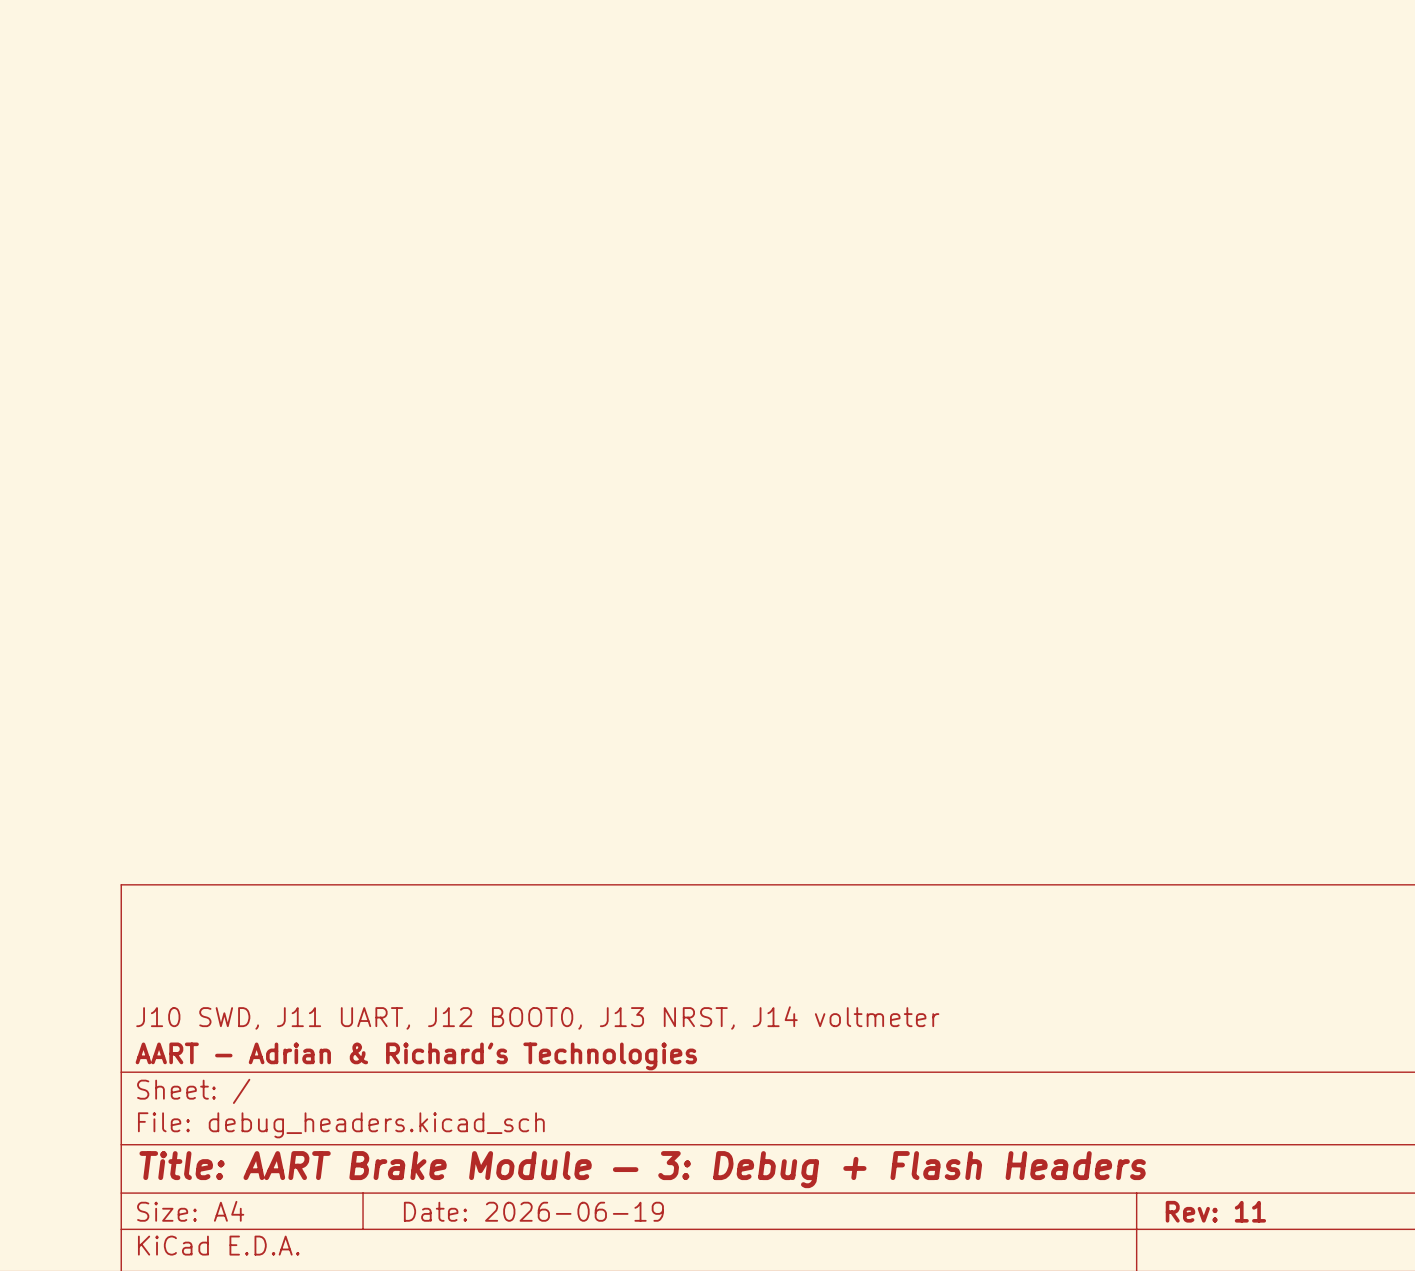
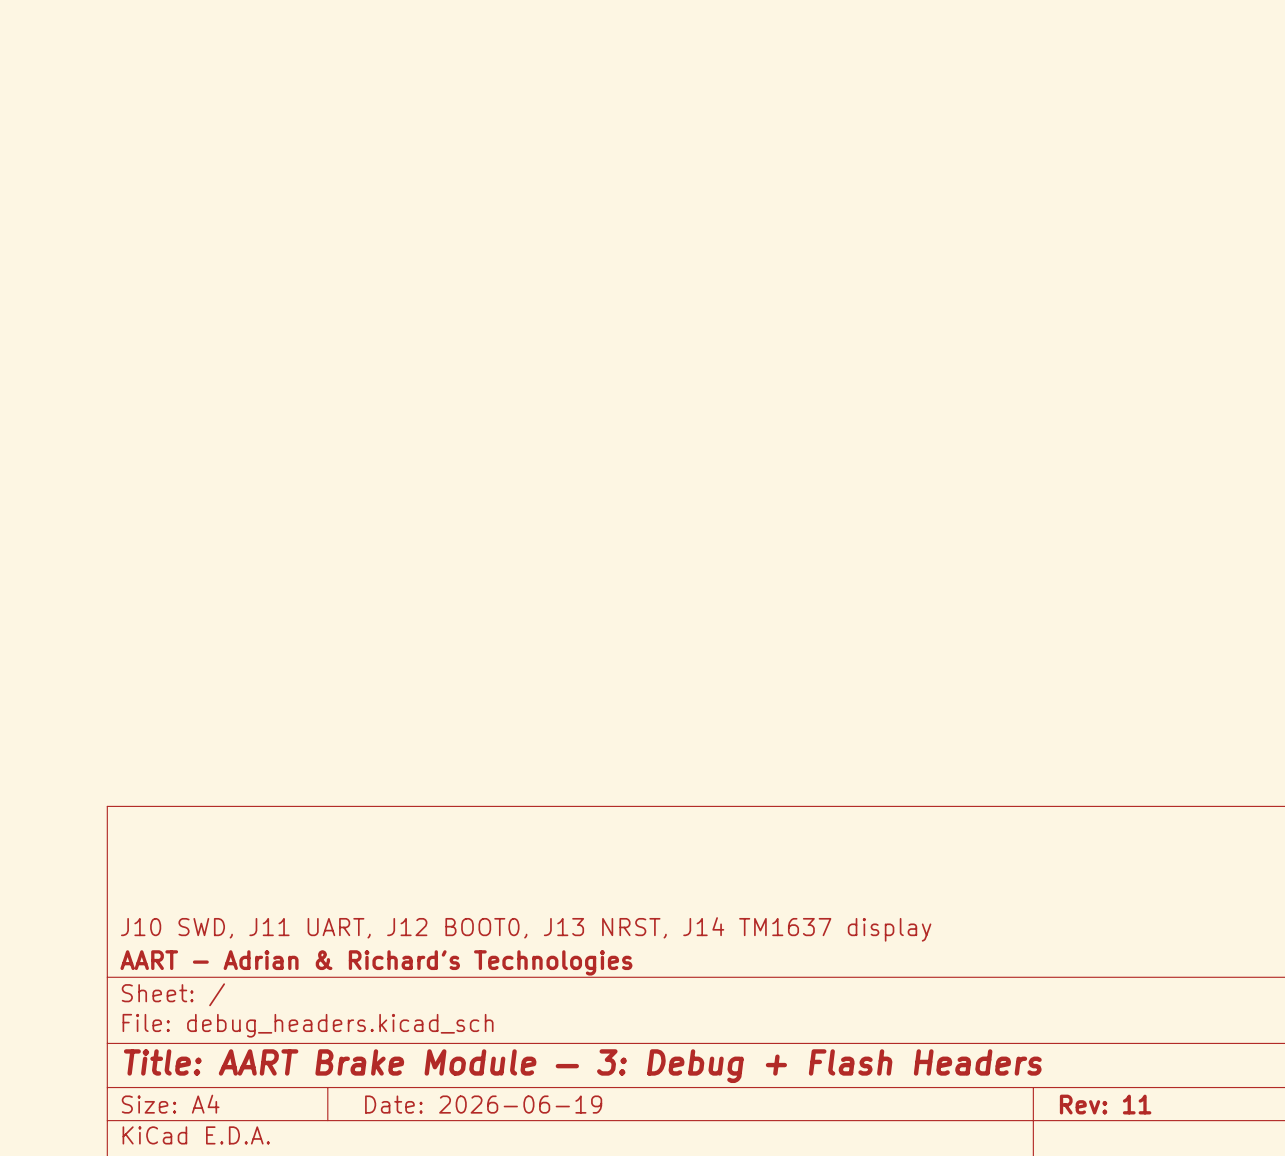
title block: J10 SWD, J11 UART, J12 BOOT0, J13 NRST, J14 voltmeter (537, 1017) -> J10 SWD, J11 UART, J12 BOOT0, J13 NRST, J14 TM1637 display (526, 929)

